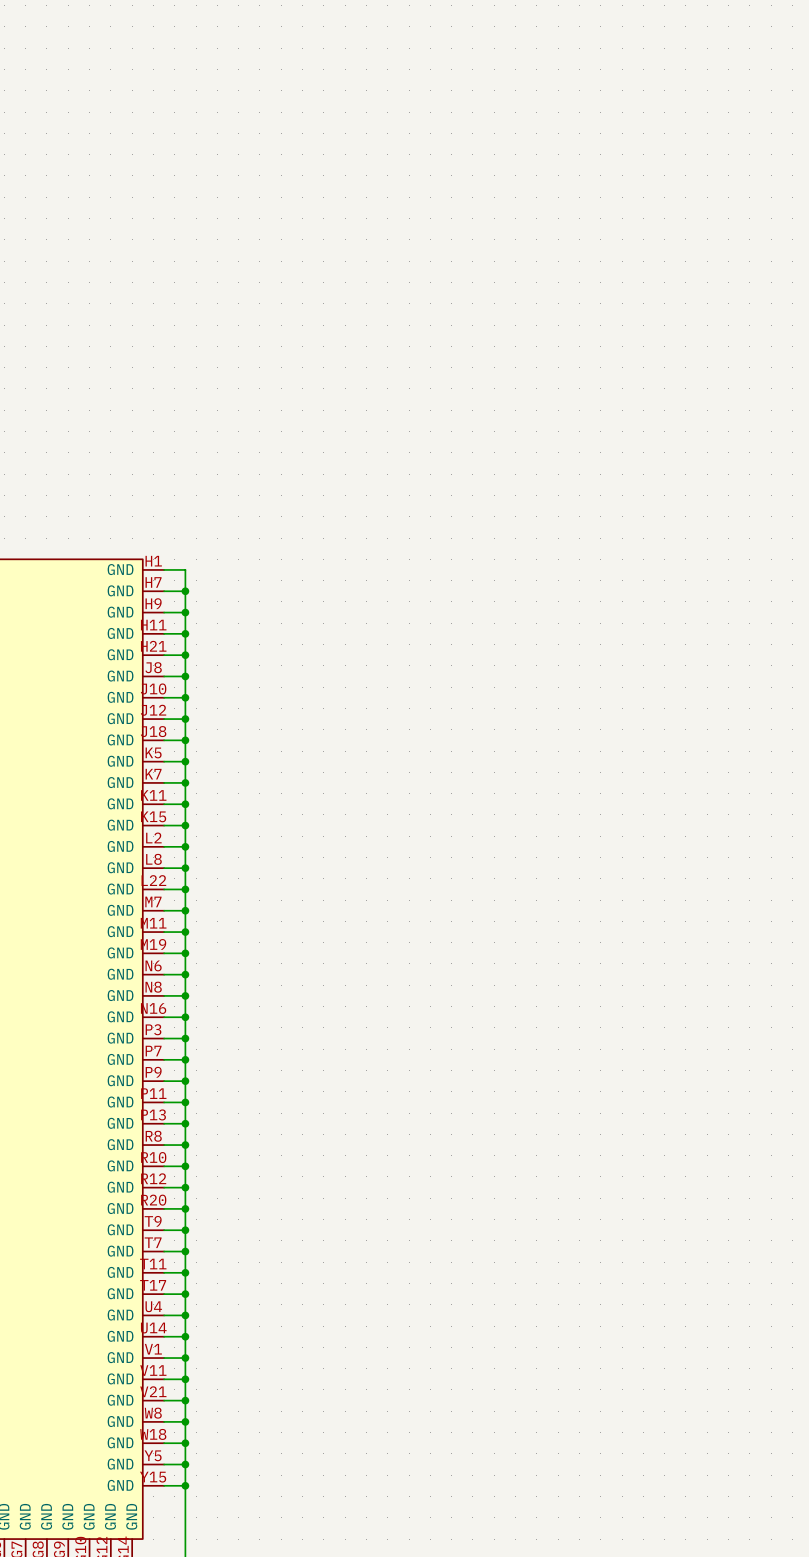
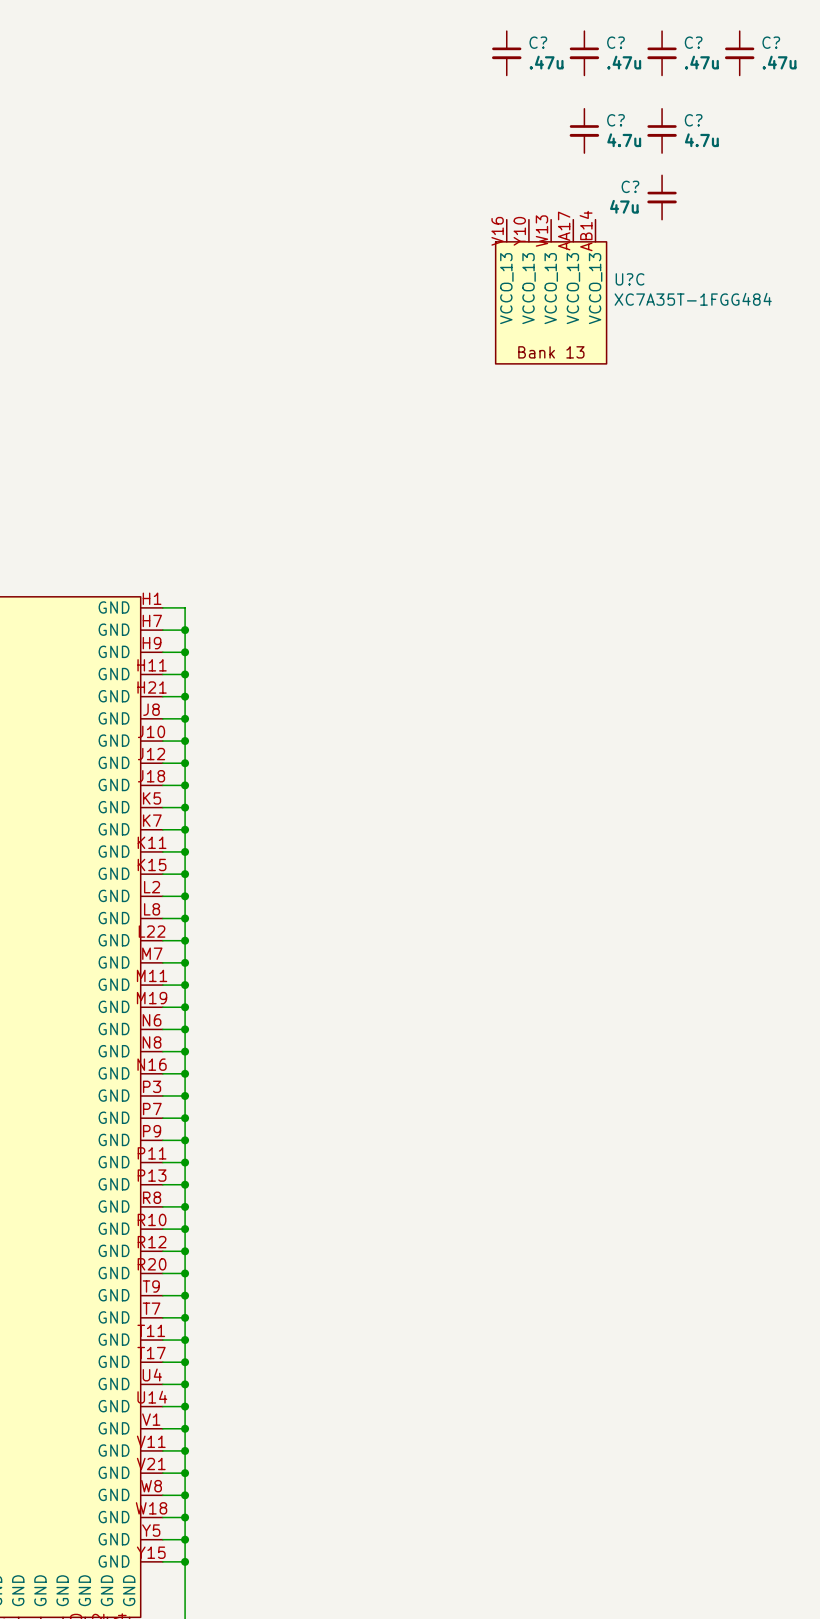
C?: none -> .47u (506, 53)
C?: none -> .47u (584, 53)
C?: none -> .47u (662, 53)
C?: none -> .47u (739, 53)
C?: none -> 4.7u (584, 130)
C?: none -> 4.7u (662, 130)
C?: none -> 47u (662, 197)
U?C: none -> XC7A35T-1FGG484 (551, 291)

